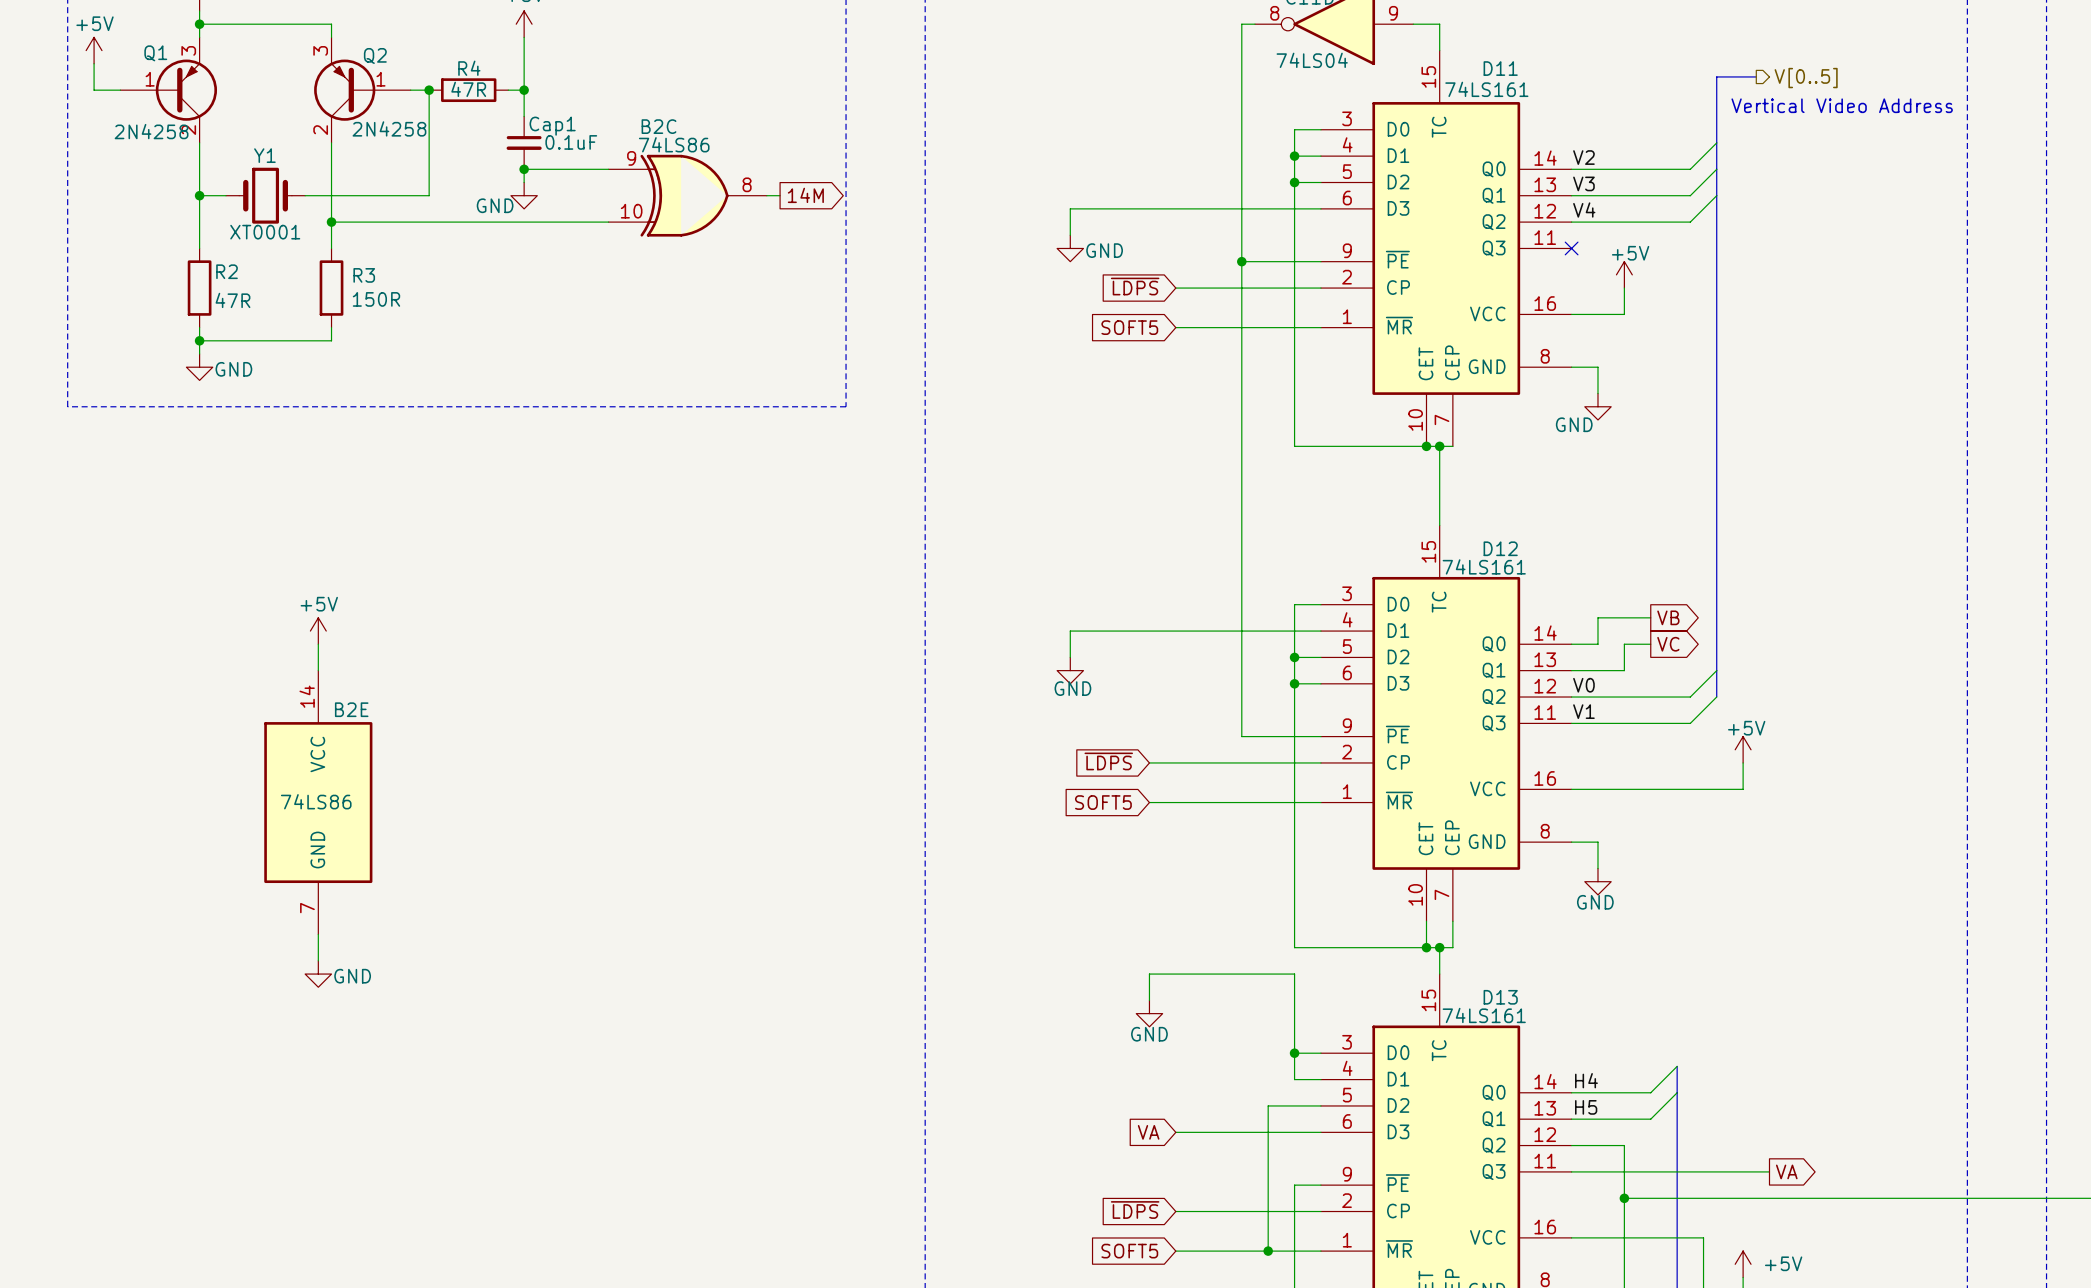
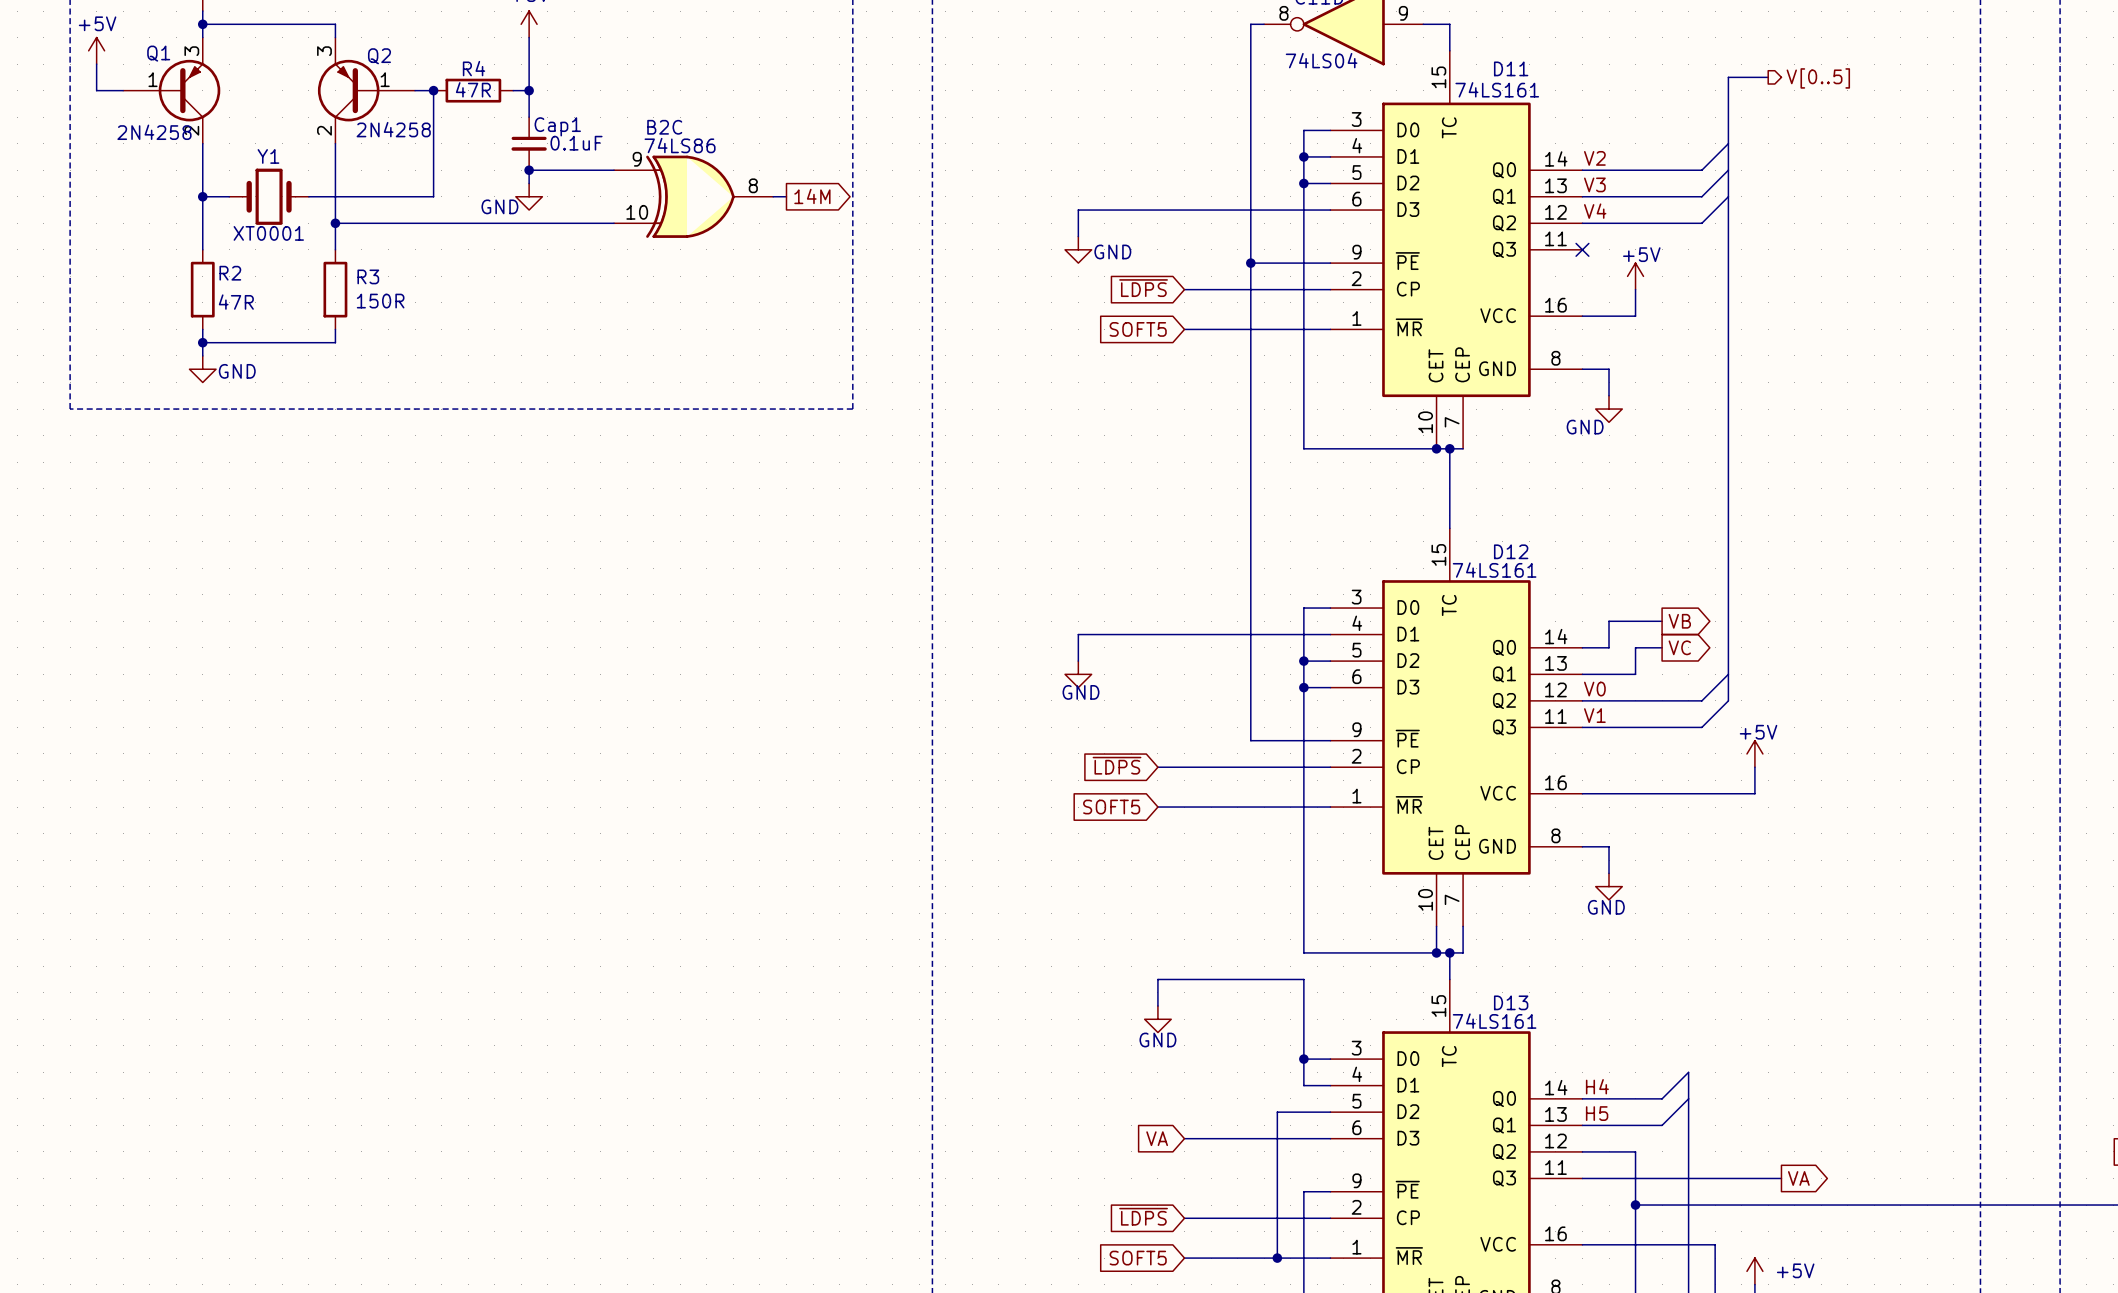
text: Vertical Video Address (1842, 105) -> none
power symbol: +5V (318, 631) -> none
wire: (318, 644) (318, 670) -> none
B2E: 74LS86 (318, 802) -> none
wire: (318, 934) (318, 960) -> none
power symbol: GND (318, 974) -> none

